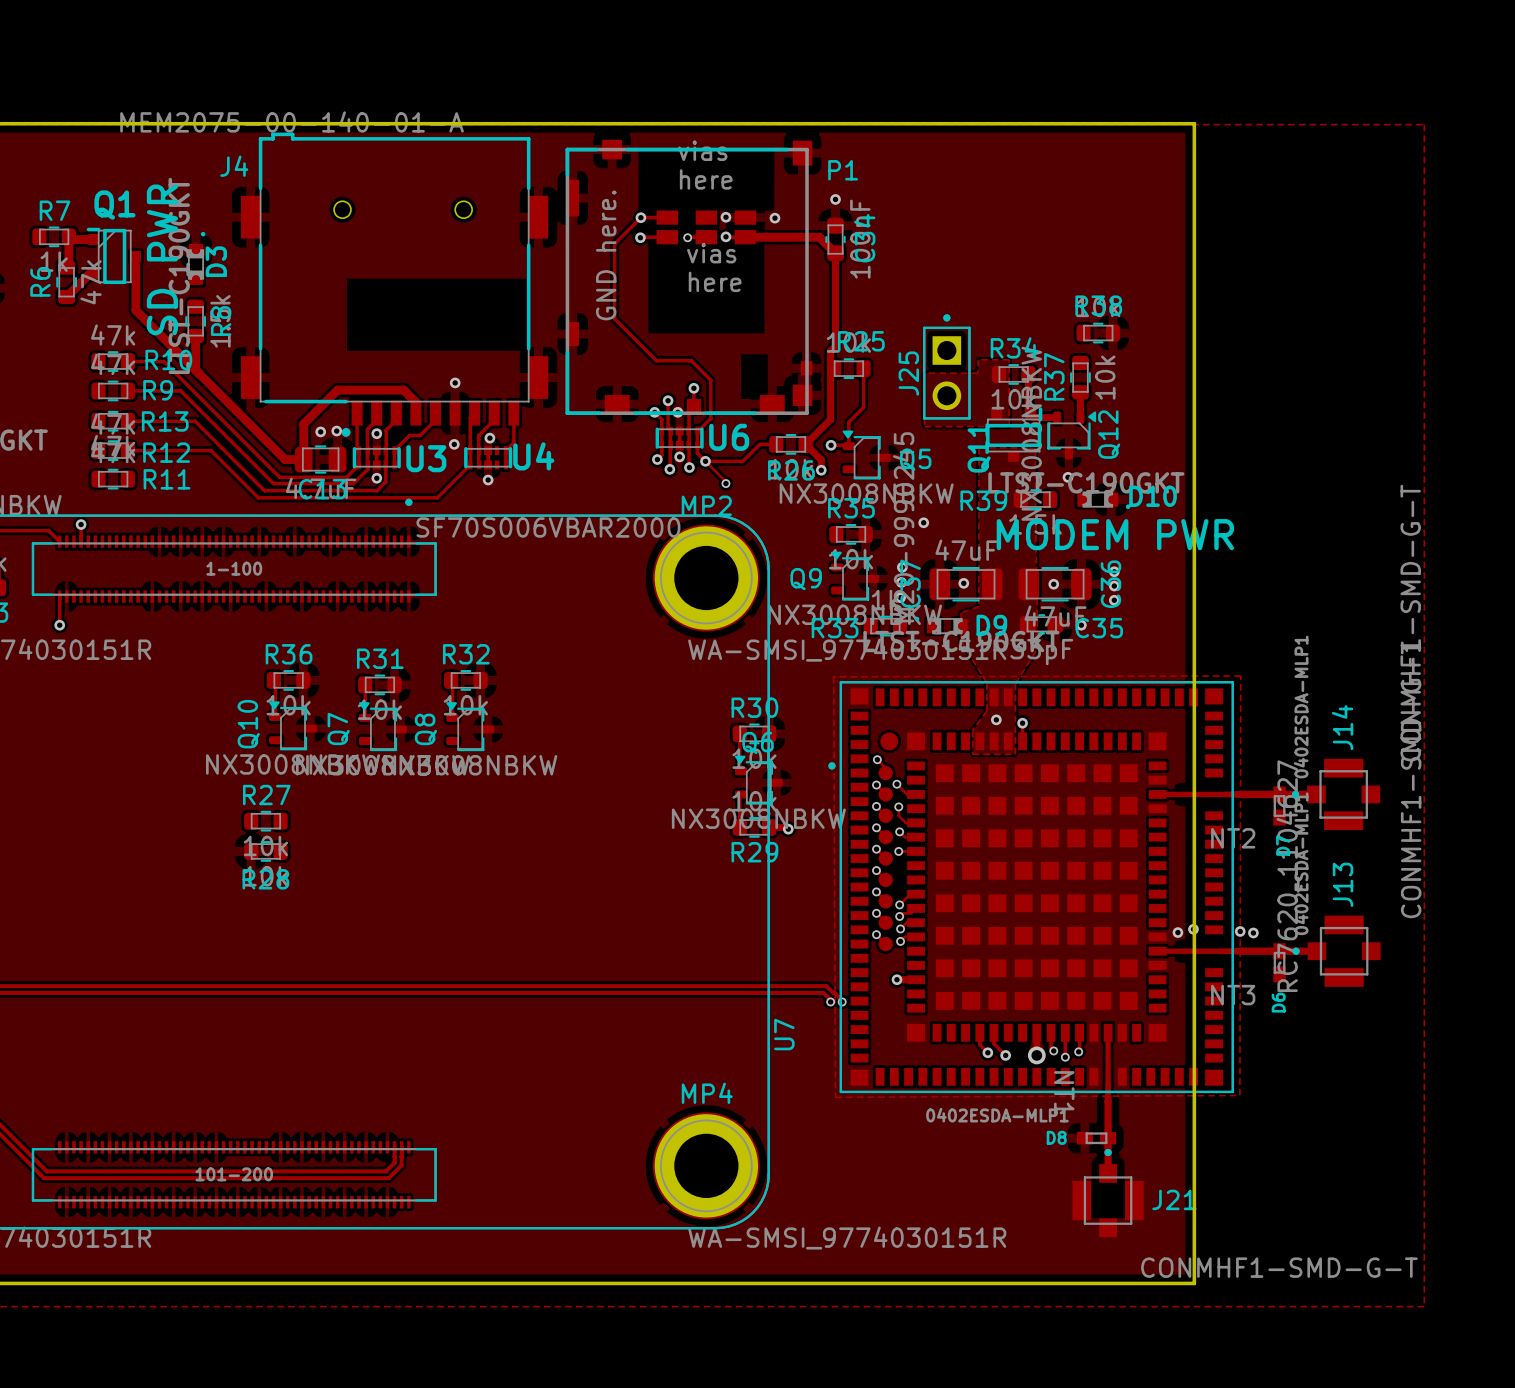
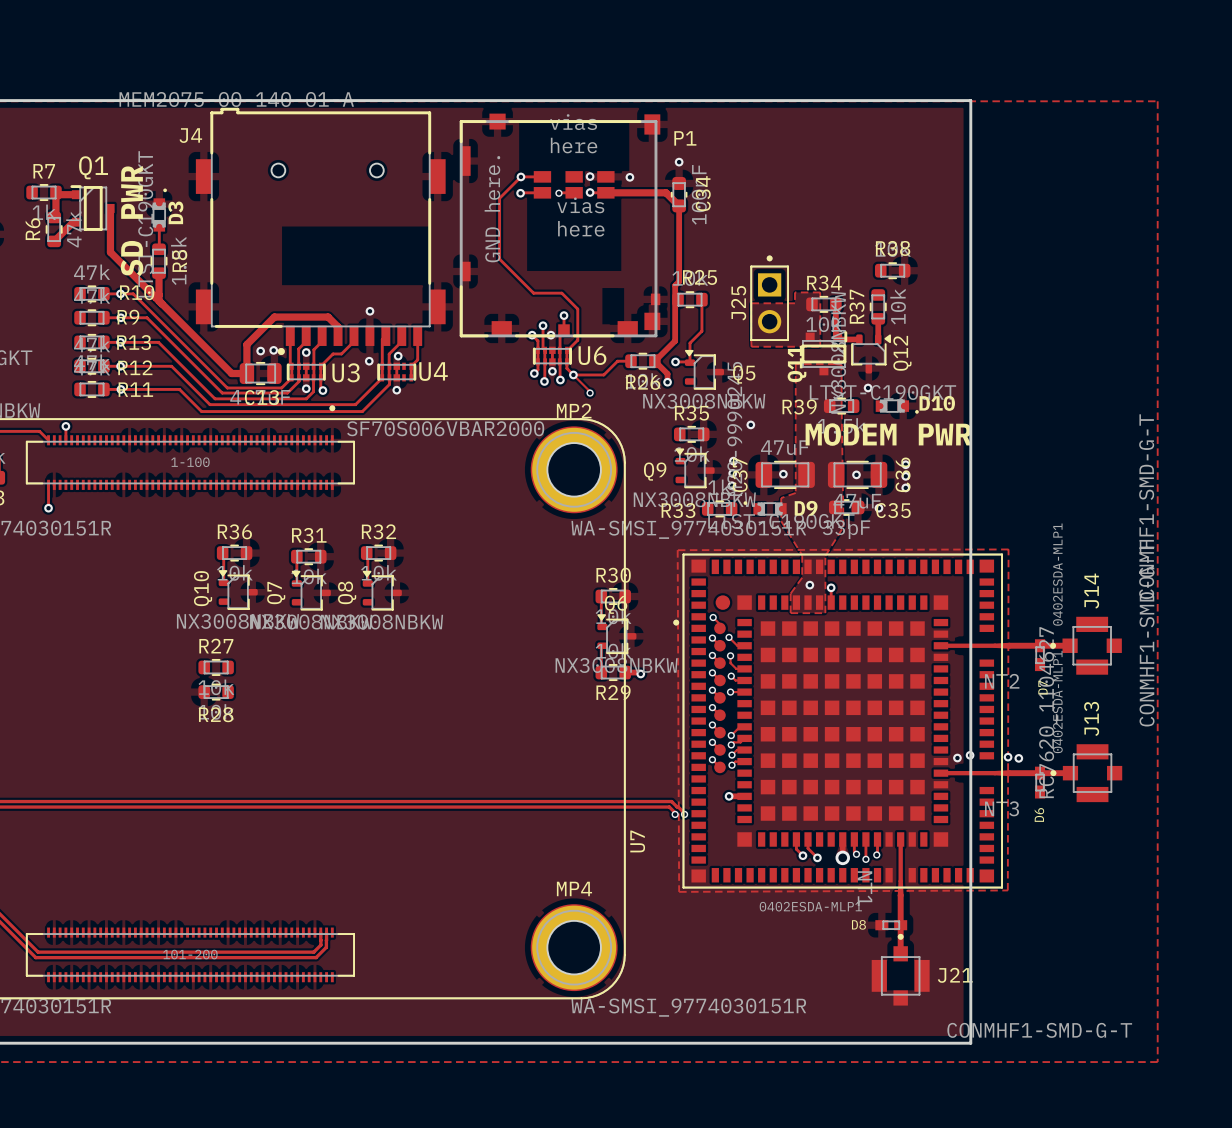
track: none -> (159, 225) (159, 249)
via: none -> (120, 293)
via: none -> (120, 317)
via: none -> (120, 342)
via: none -> (120, 366)
track: none -> (320, 377) (320, 388) (322, 390)
track: none -> (389, 377) (389, 384) (362, 411) (201, 411) (179, 389) (103, 389)
via: none -> (120, 389)
via: none -> (322, 390)

